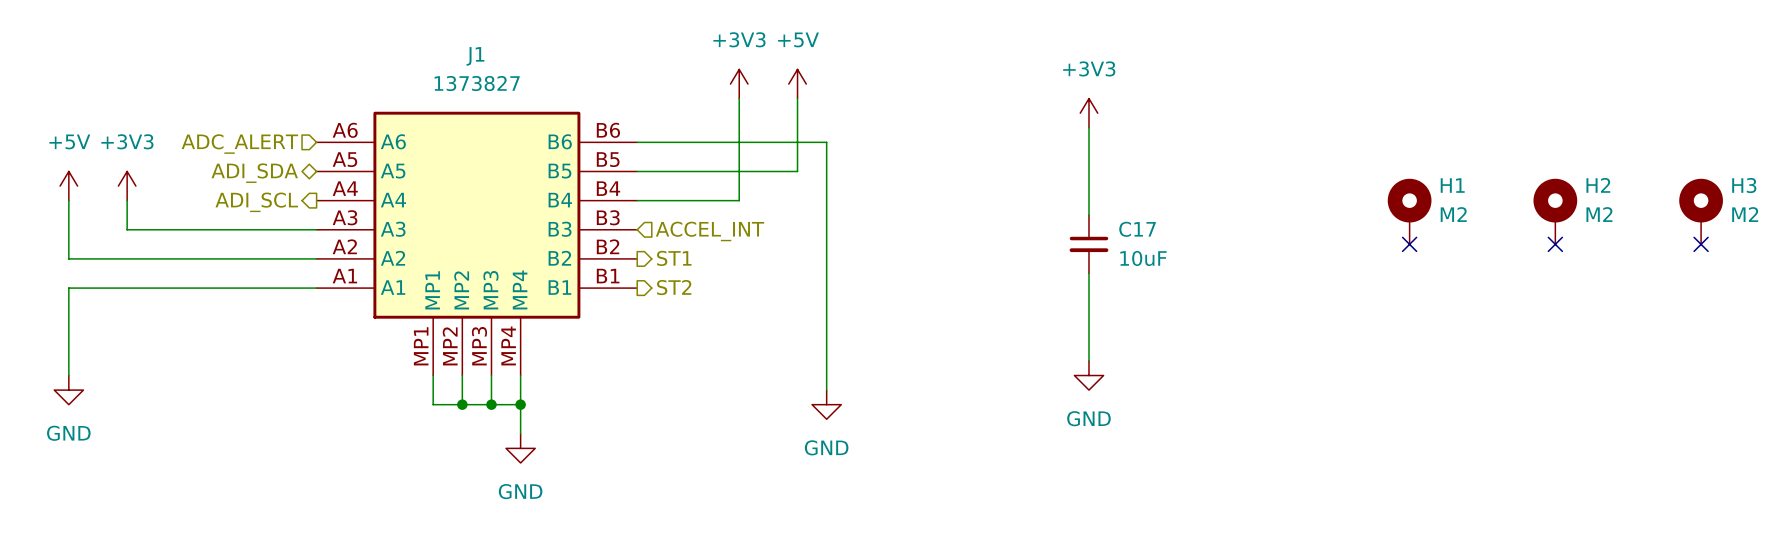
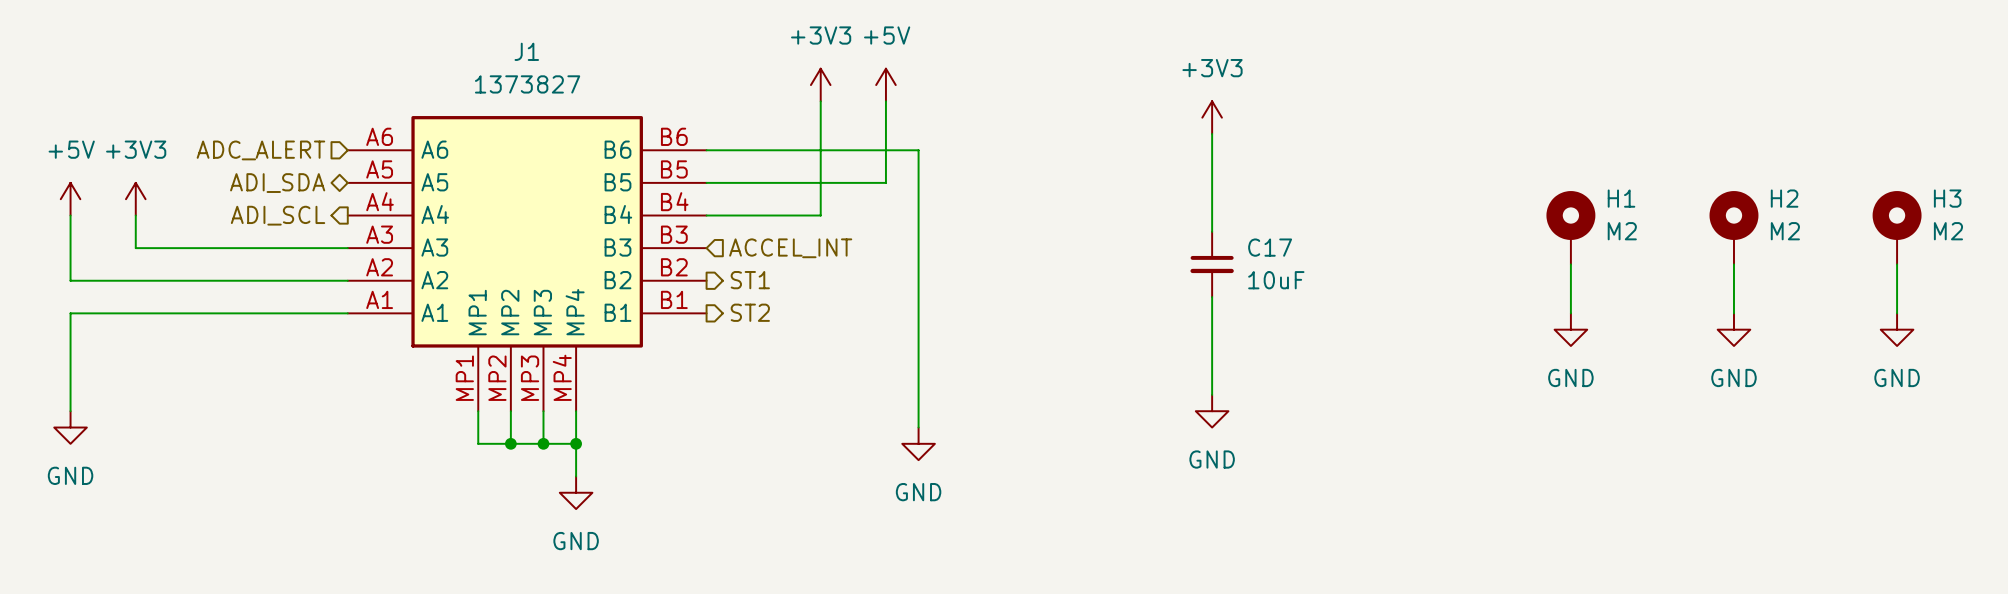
wire: none -> (1570, 264) (1570, 313)
no-connect mark: (1409, 244) -> none
wire: none -> (1733, 264) (1733, 313)
no-connect mark: (1555, 244) -> none
wire: none -> (1897, 264) (1897, 313)
no-connect mark: (1701, 244) -> none
power symbol: none -> GND (1570, 329)
power symbol: none -> GND (1733, 329)
power symbol: none -> GND (1897, 329)

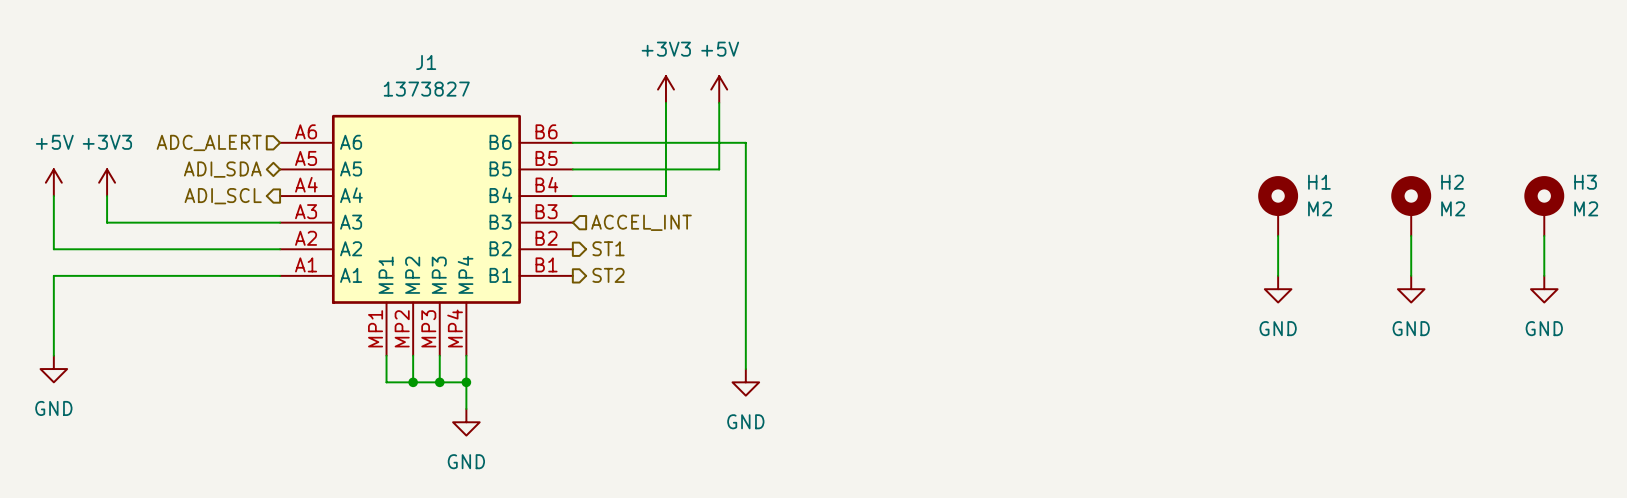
power symbol: +3V3 (1212, 117) -> none
wire: (1212, 133) (1212, 231) -> none
C17: 10uF (1212, 264) -> none
wire: (1212, 297) (1212, 394) -> none
power symbol: GND (1212, 411) -> none

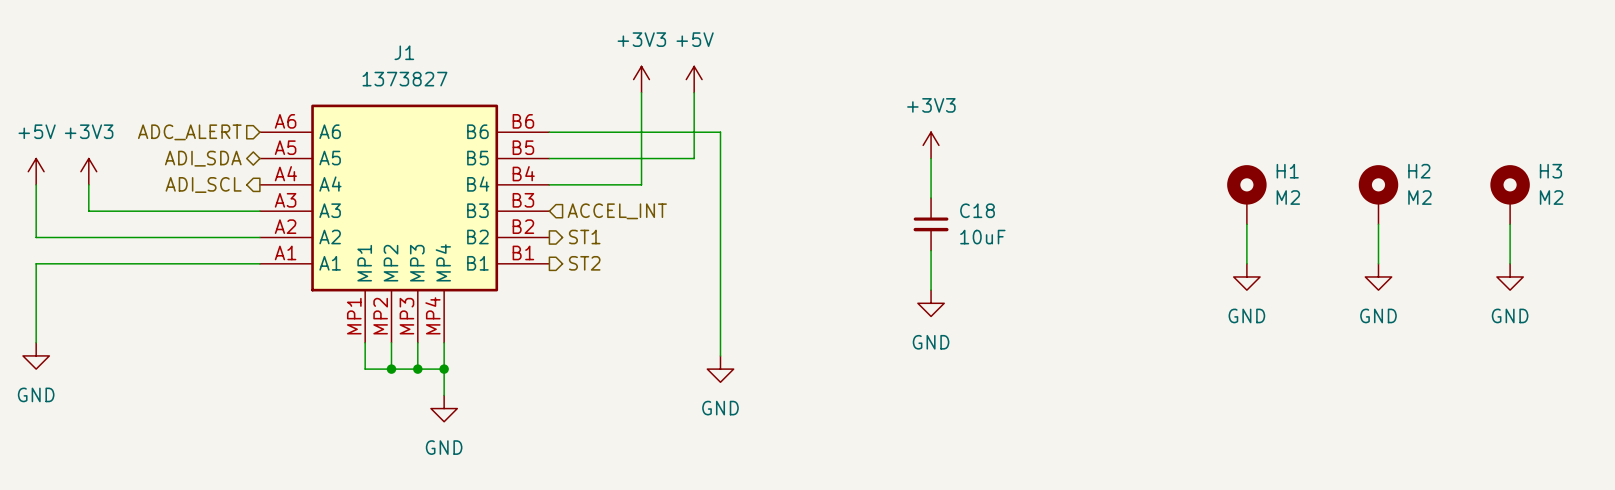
power symbol: none -> +3V3 (931, 145)
wire: none -> (931, 158) (931, 198)
C18: none -> 10uF (931, 224)
wire: none -> (931, 250) (931, 290)
power symbol: none -> GND (931, 303)

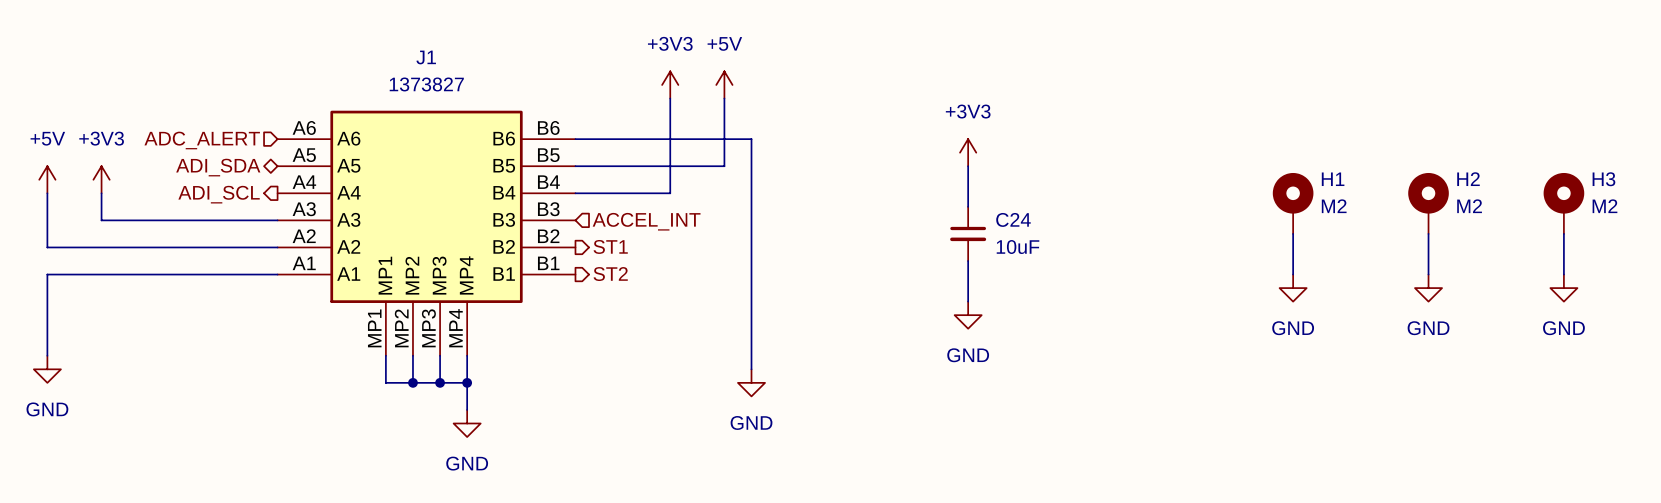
C18 name: C18 (977, 210) -> C24 (1013, 219)

